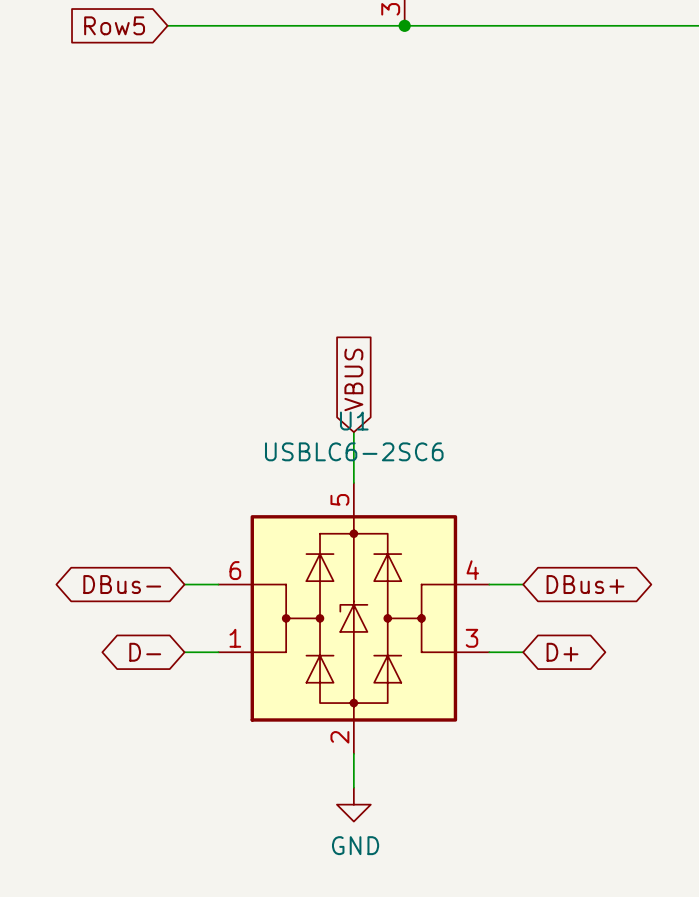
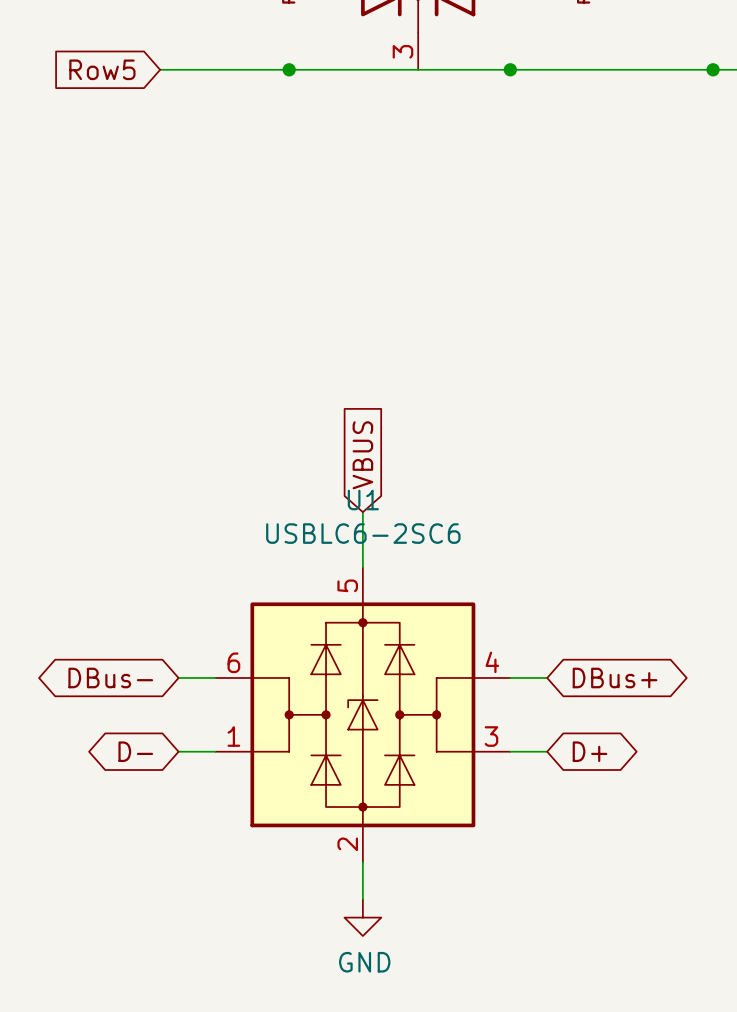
junction: none -> (289, 69)
junction: (404, 25) -> none
junction: none -> (510, 69)
junction: none -> (713, 69)

